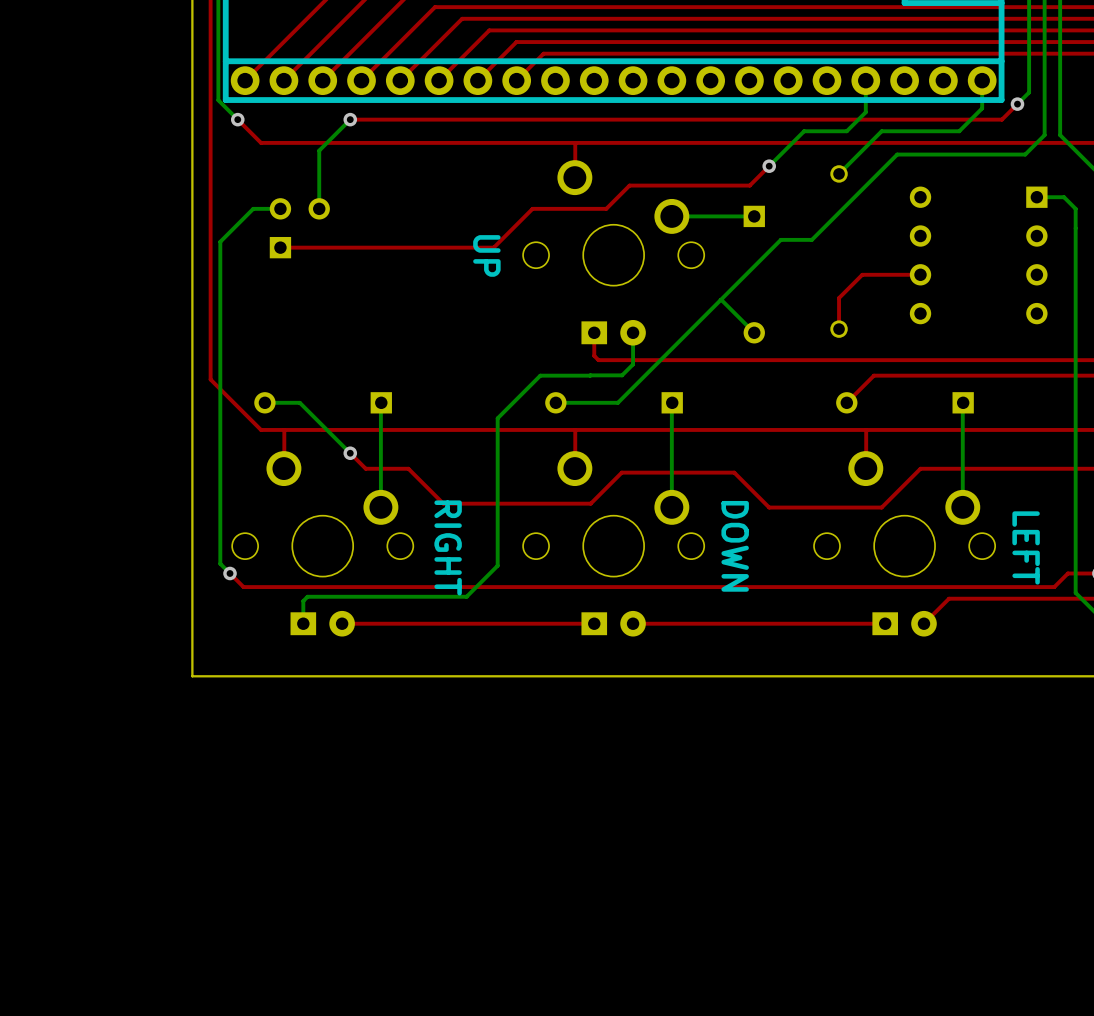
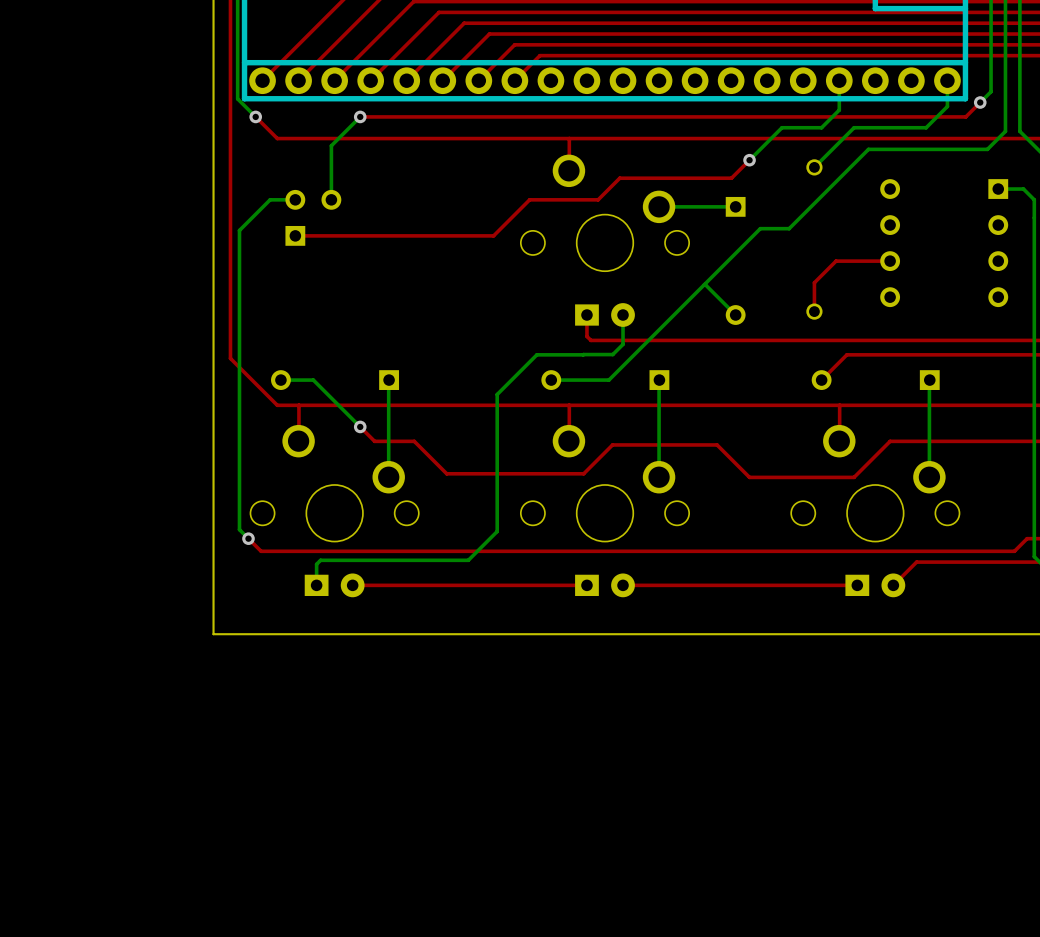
text: UP (486, 255) -> none
text: DOWN (735, 546) -> none
text: RIGHT (448, 547) -> none
text: LEFT (1026, 547) -> none

